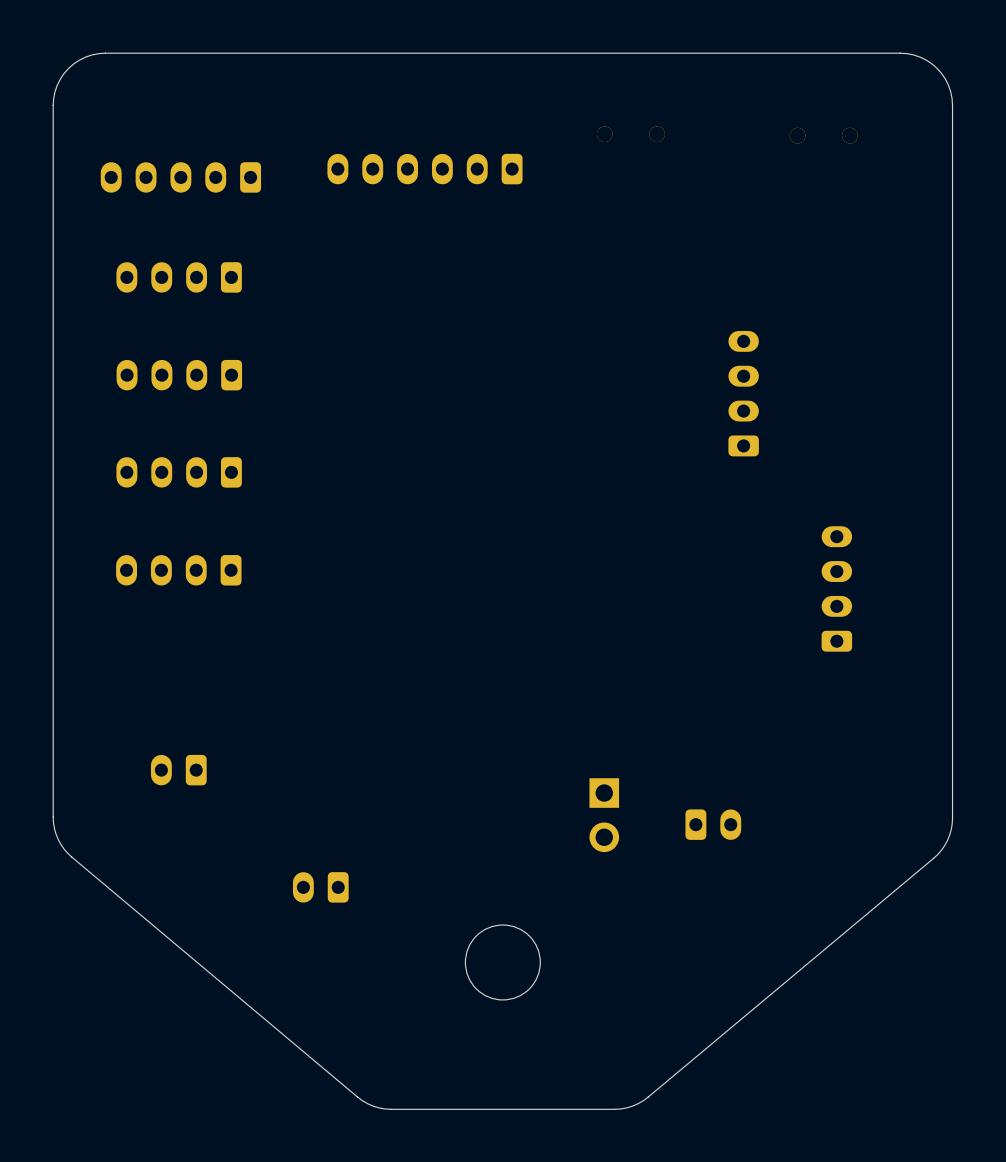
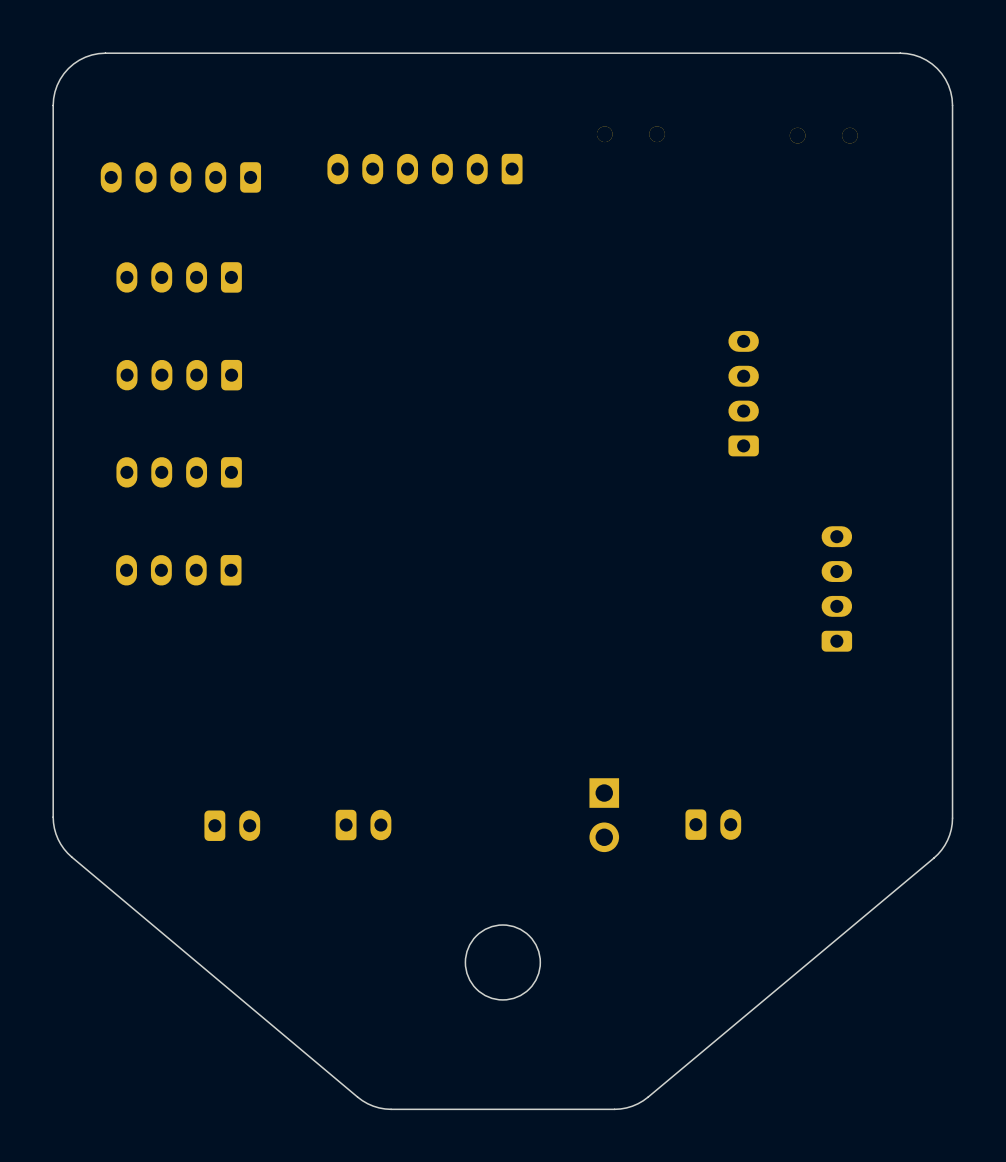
part: (178, 770) -> none
part: none -> (232, 825)
part: none -> (363, 825)
part: (320, 887) -> none

